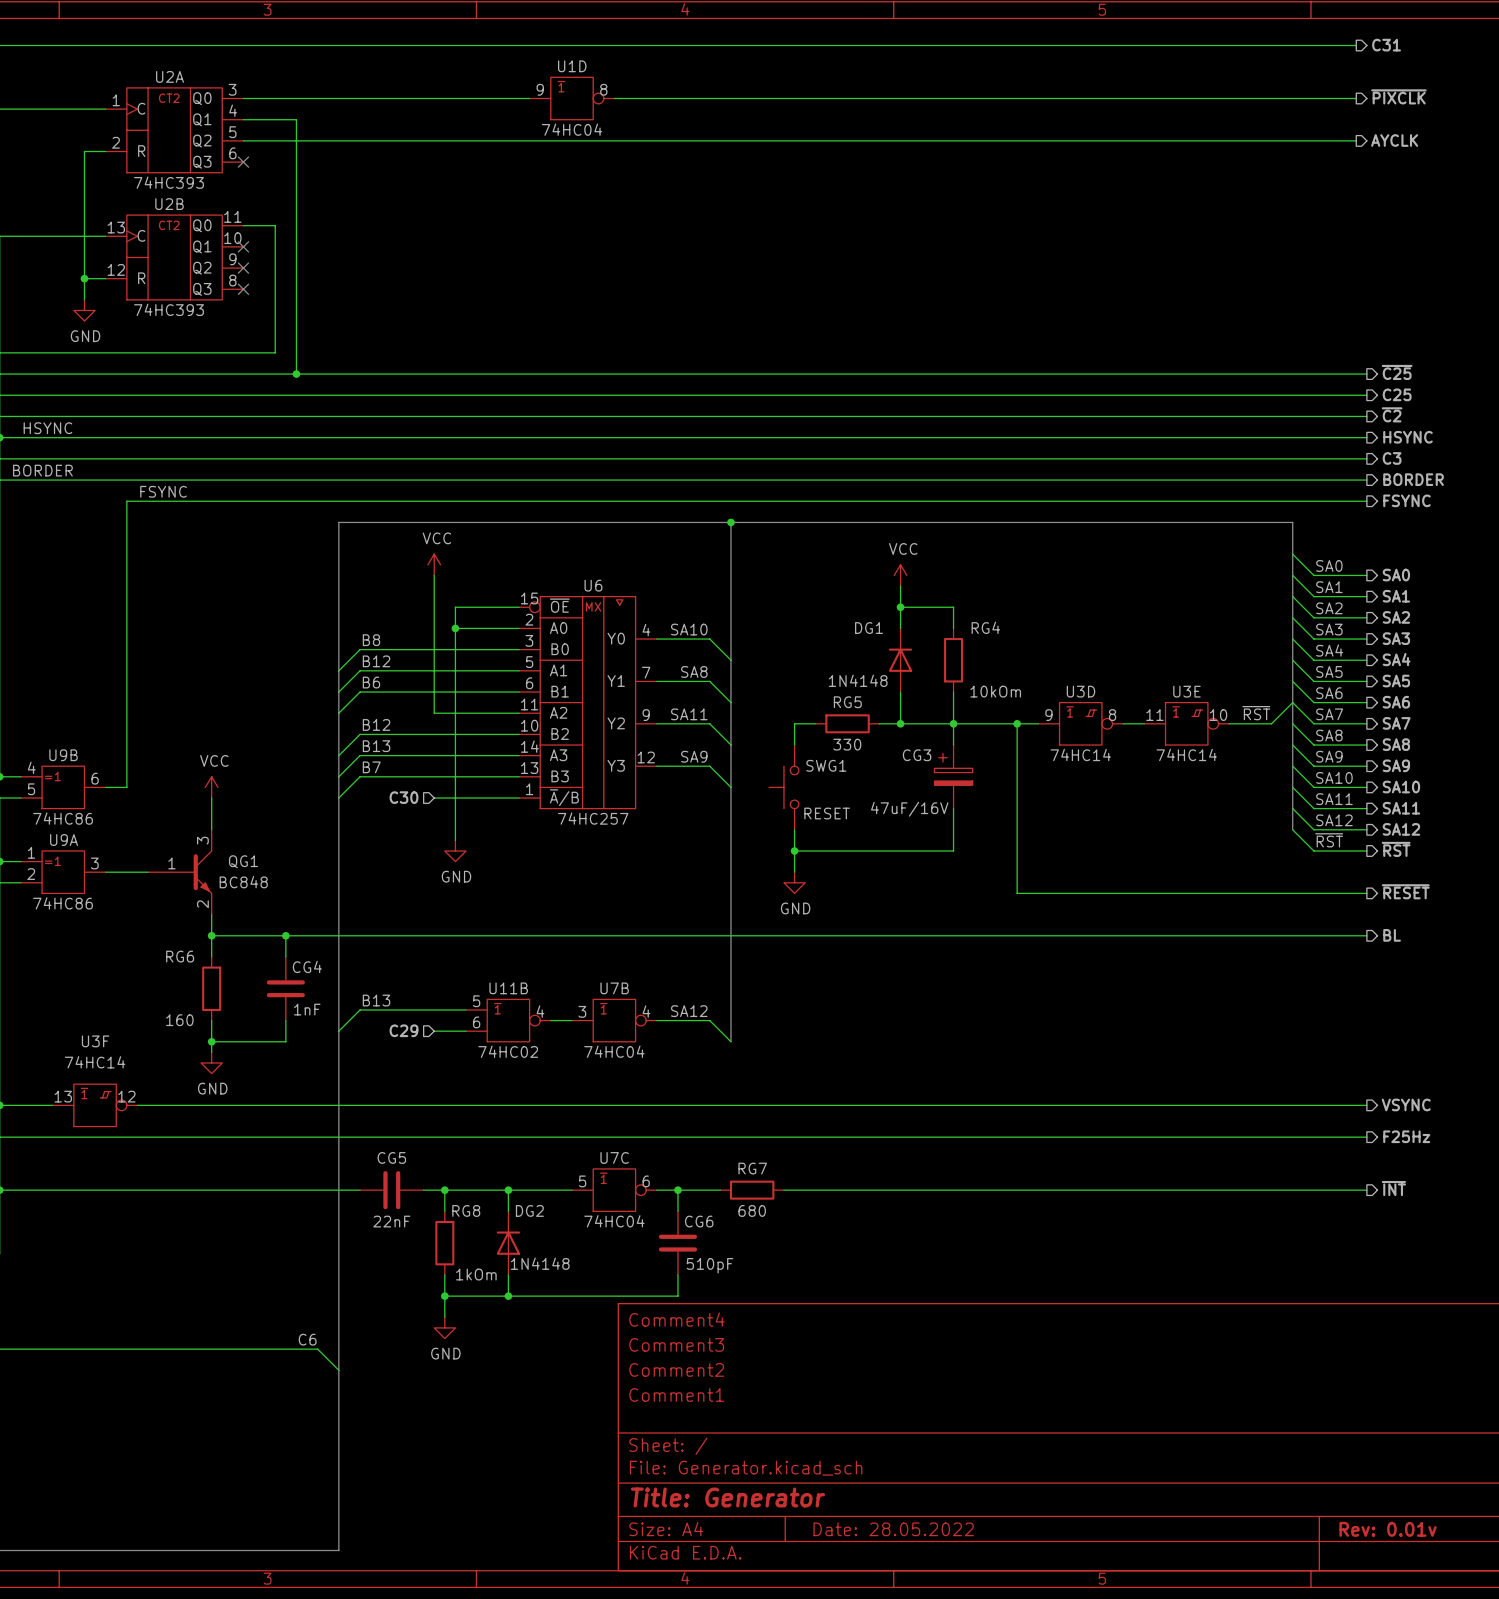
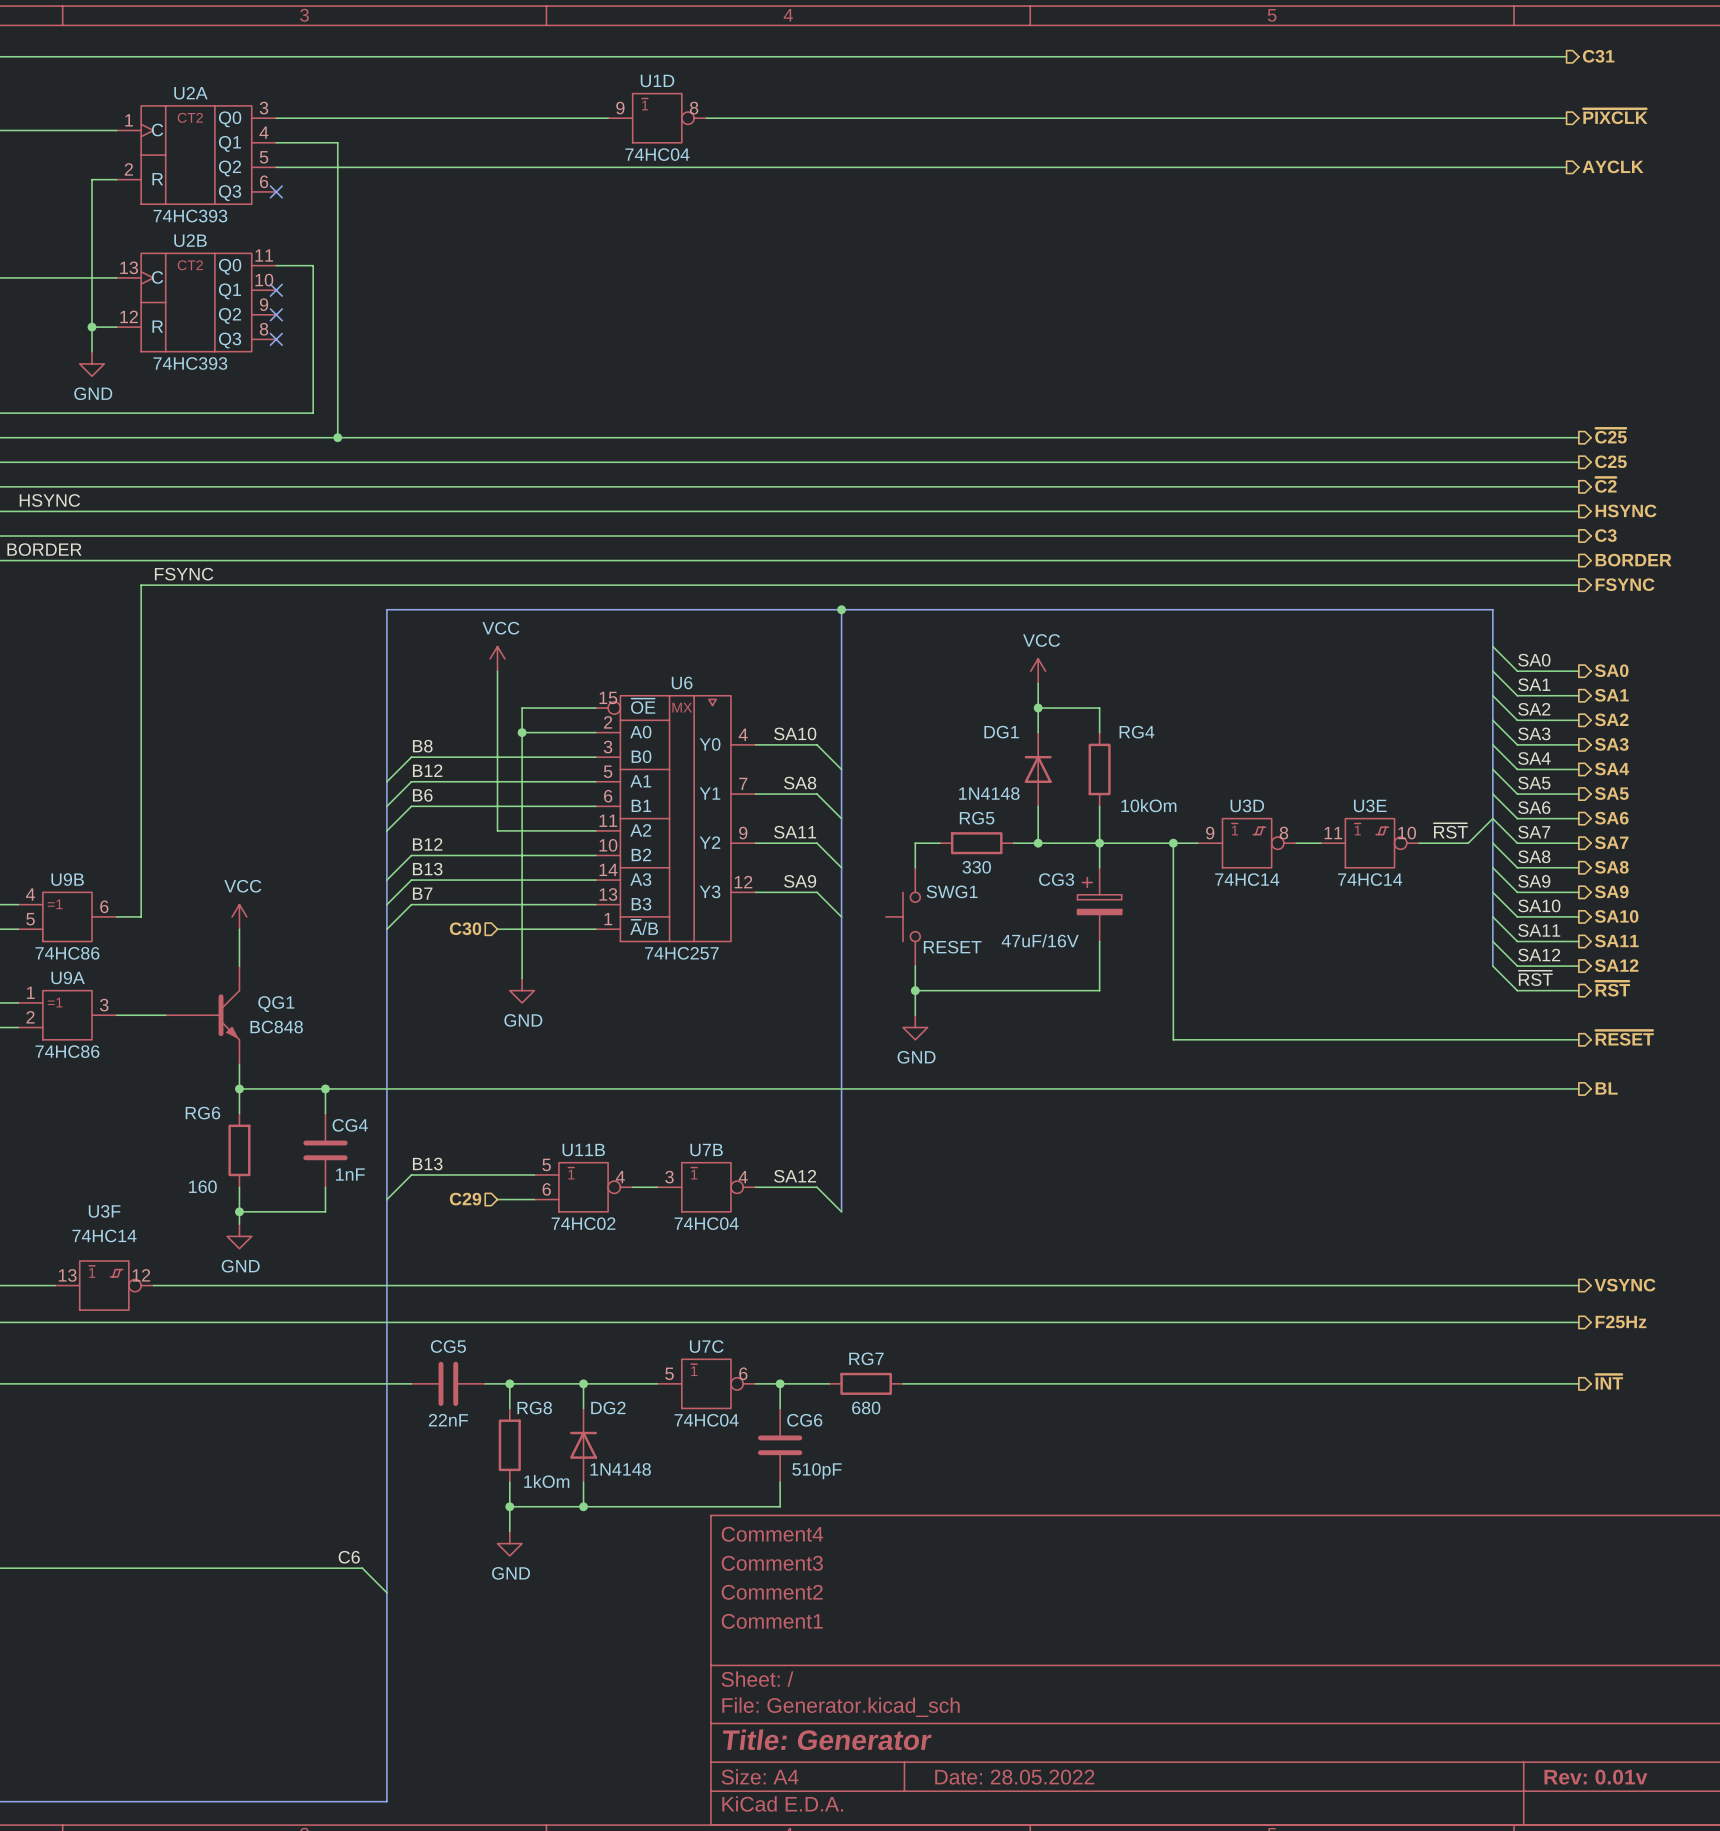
QG1 pin number: 3 (202, 840) -> none
QG1 pin number: 1 (171, 863) -> none
QG1 pin number: 2 (202, 904) -> none

